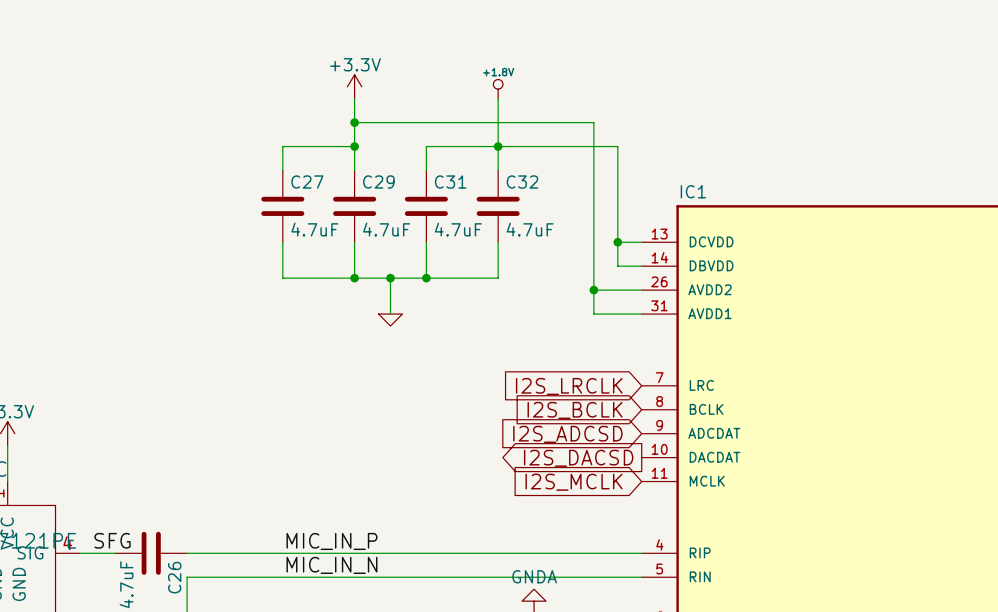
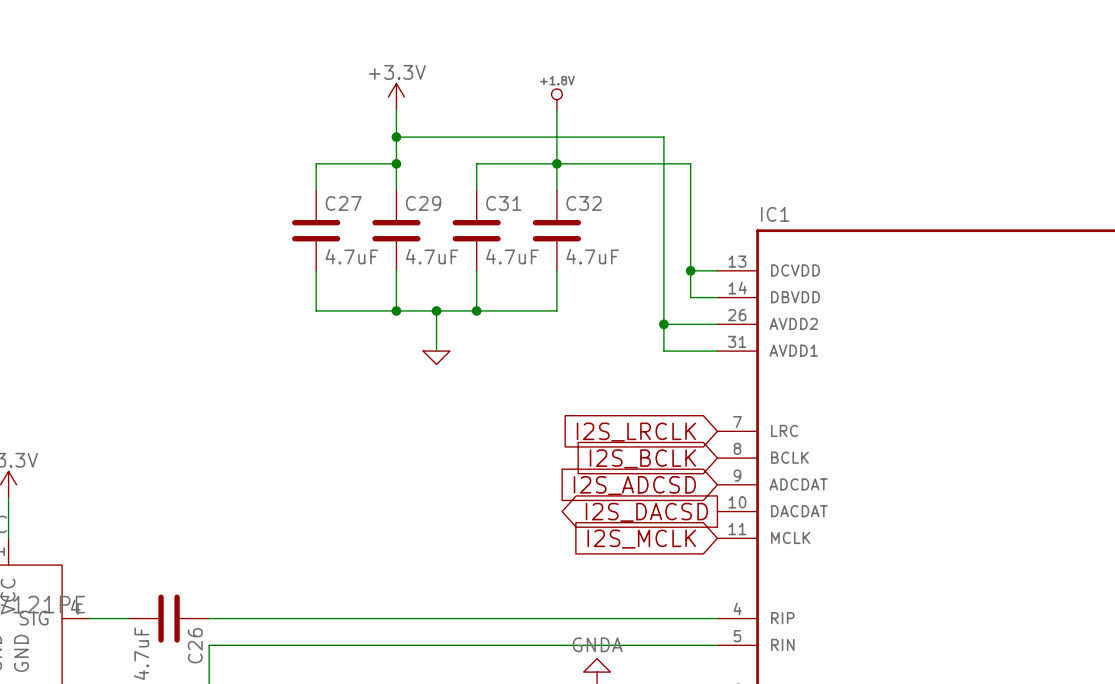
label: SFG (112, 540) -> none
label: MIC_IN_P (331, 541) -> none
label: MIC_IN_N (331, 565) -> none

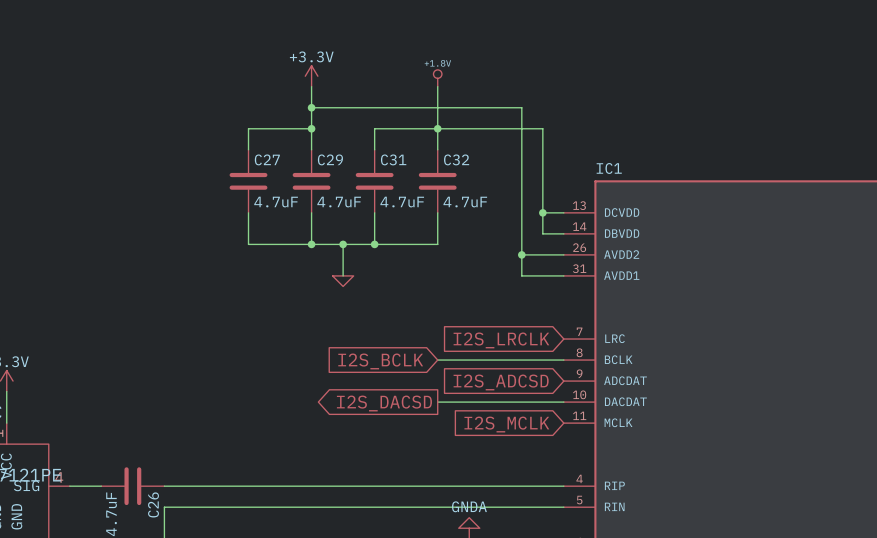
wire: none -> (437, 360) (563, 360)
global label position: I2S_BCLK (642, 458) -> I2S_BCLK (380, 361)
wire: none -> (437, 402) (563, 402)
global label position: I2S_DACSD (646, 512) -> I2S_DACSD (384, 403)

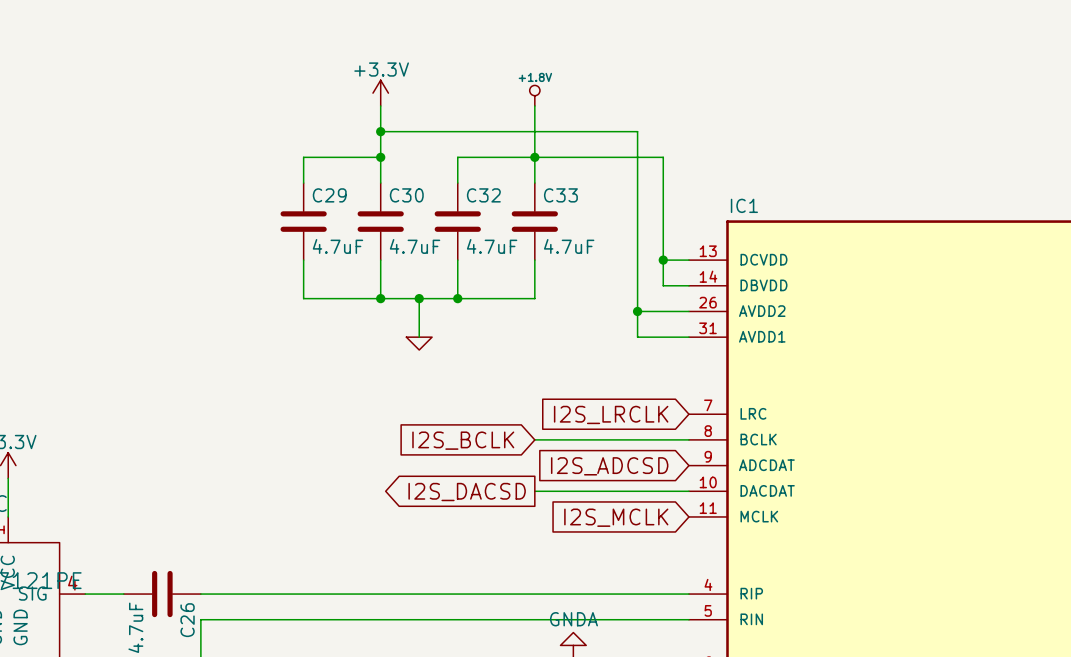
C27 name: C27 (267, 159) -> C29 (329, 195)
C29 name: C29 (330, 159) -> C30 (406, 195)
C31 name: C31 (393, 159) -> C32 (483, 195)
C32 name: C32 (456, 159) -> C33 (560, 195)

